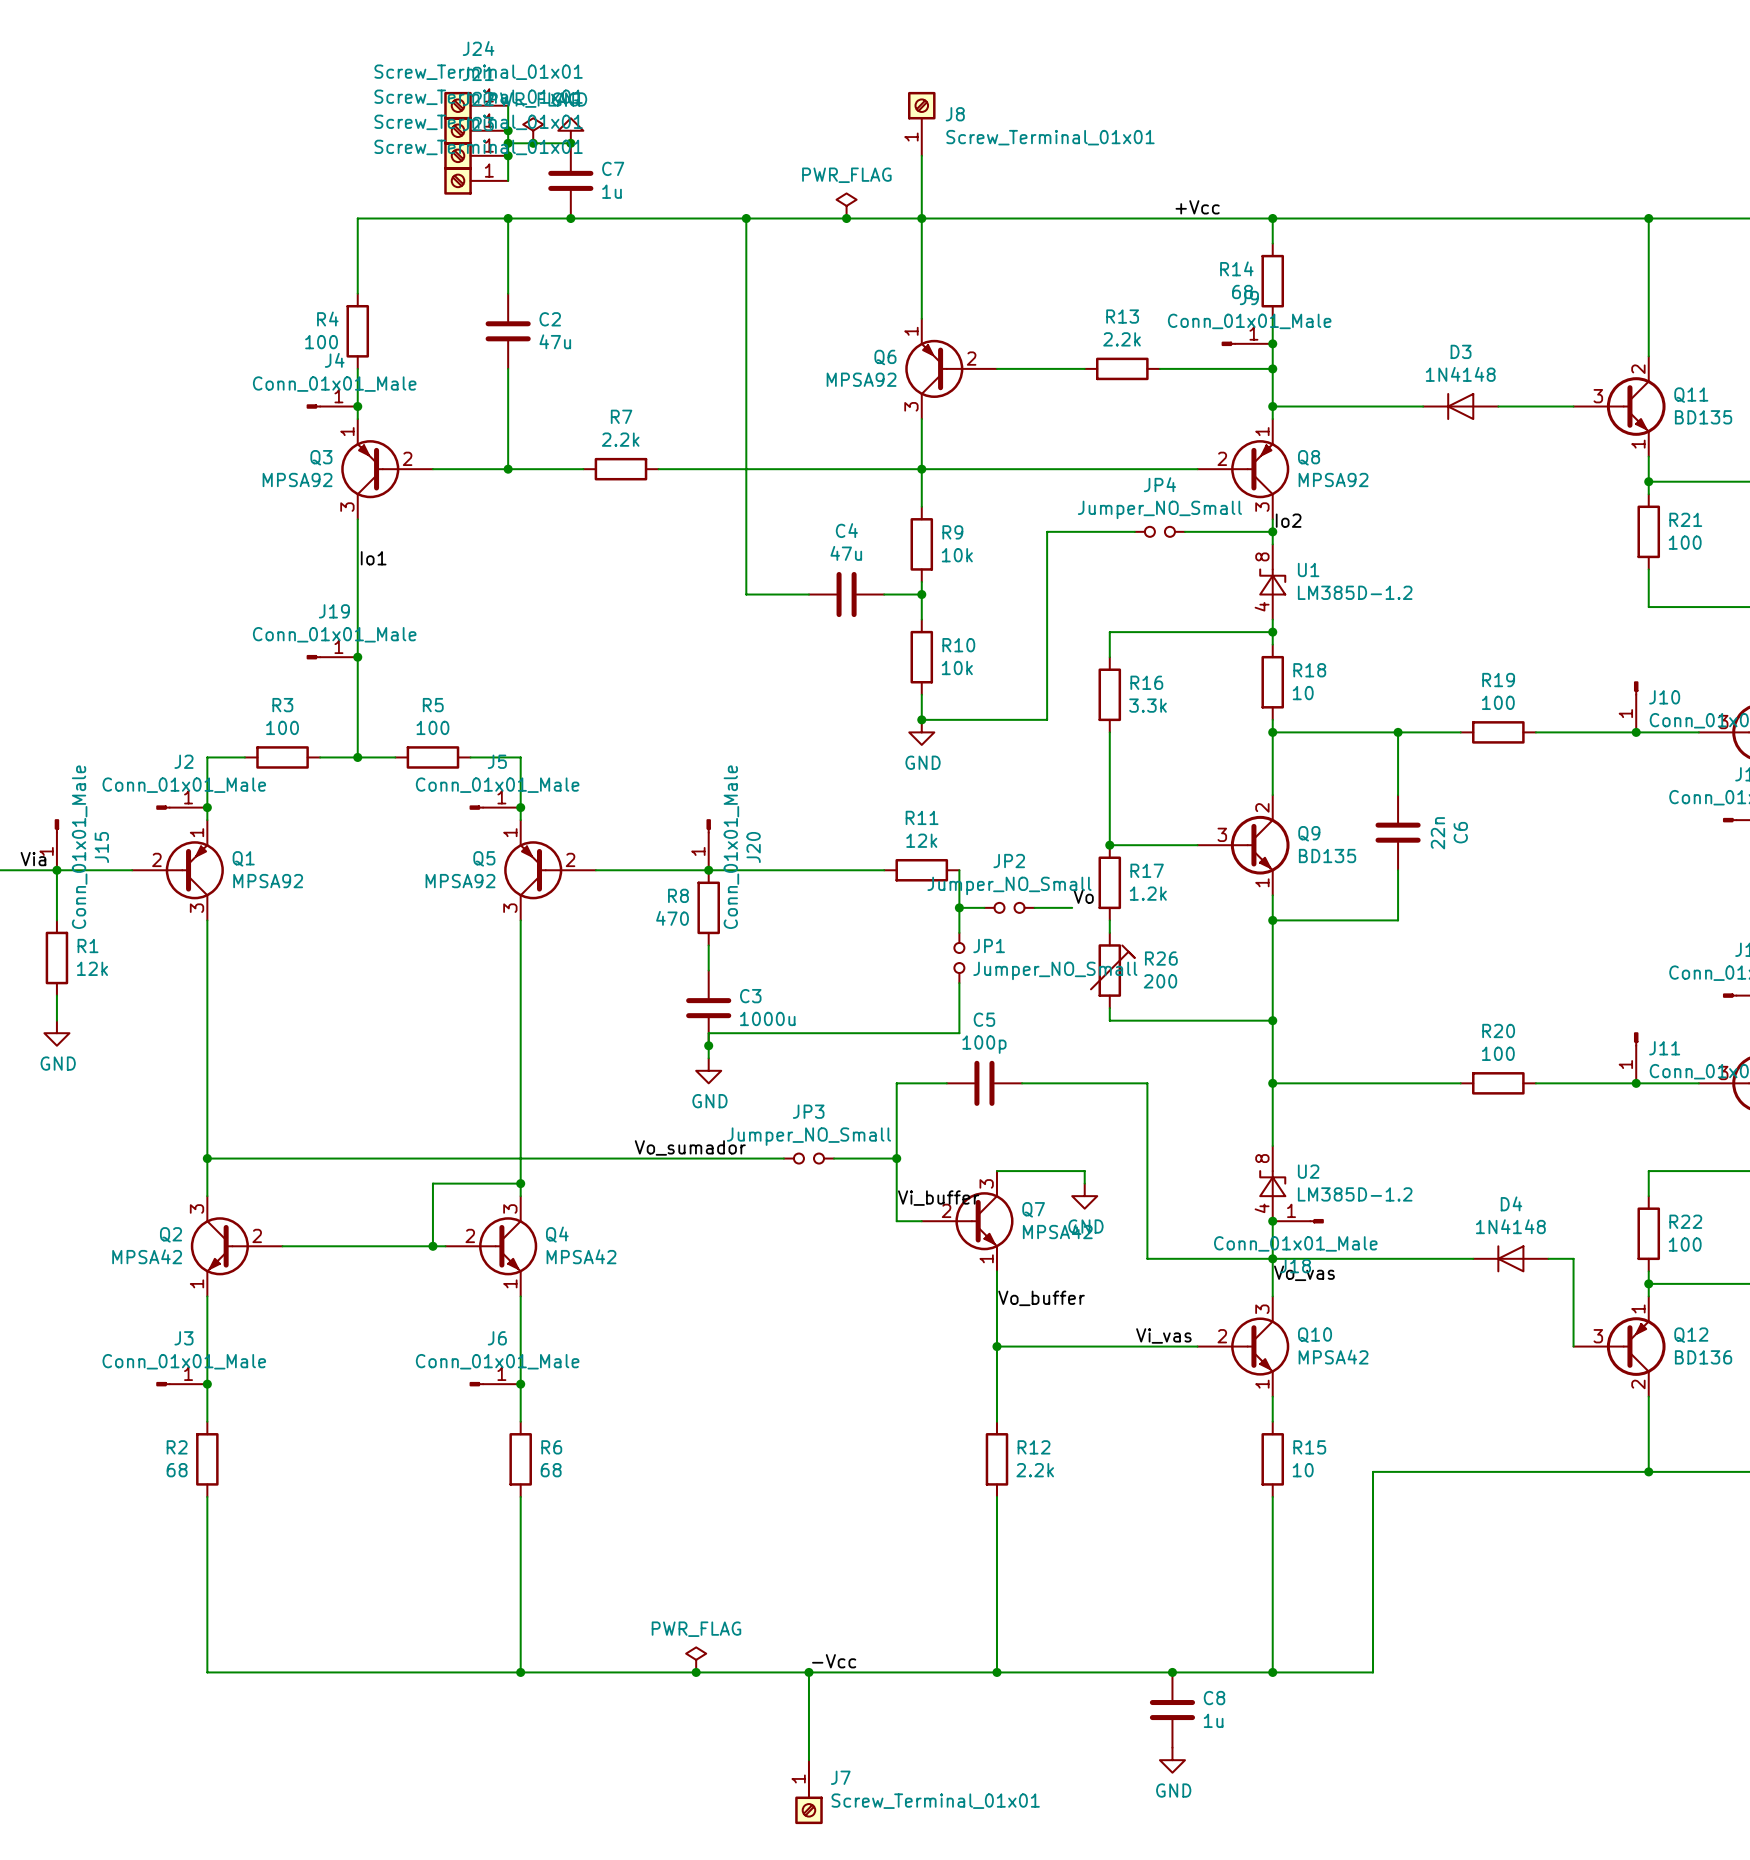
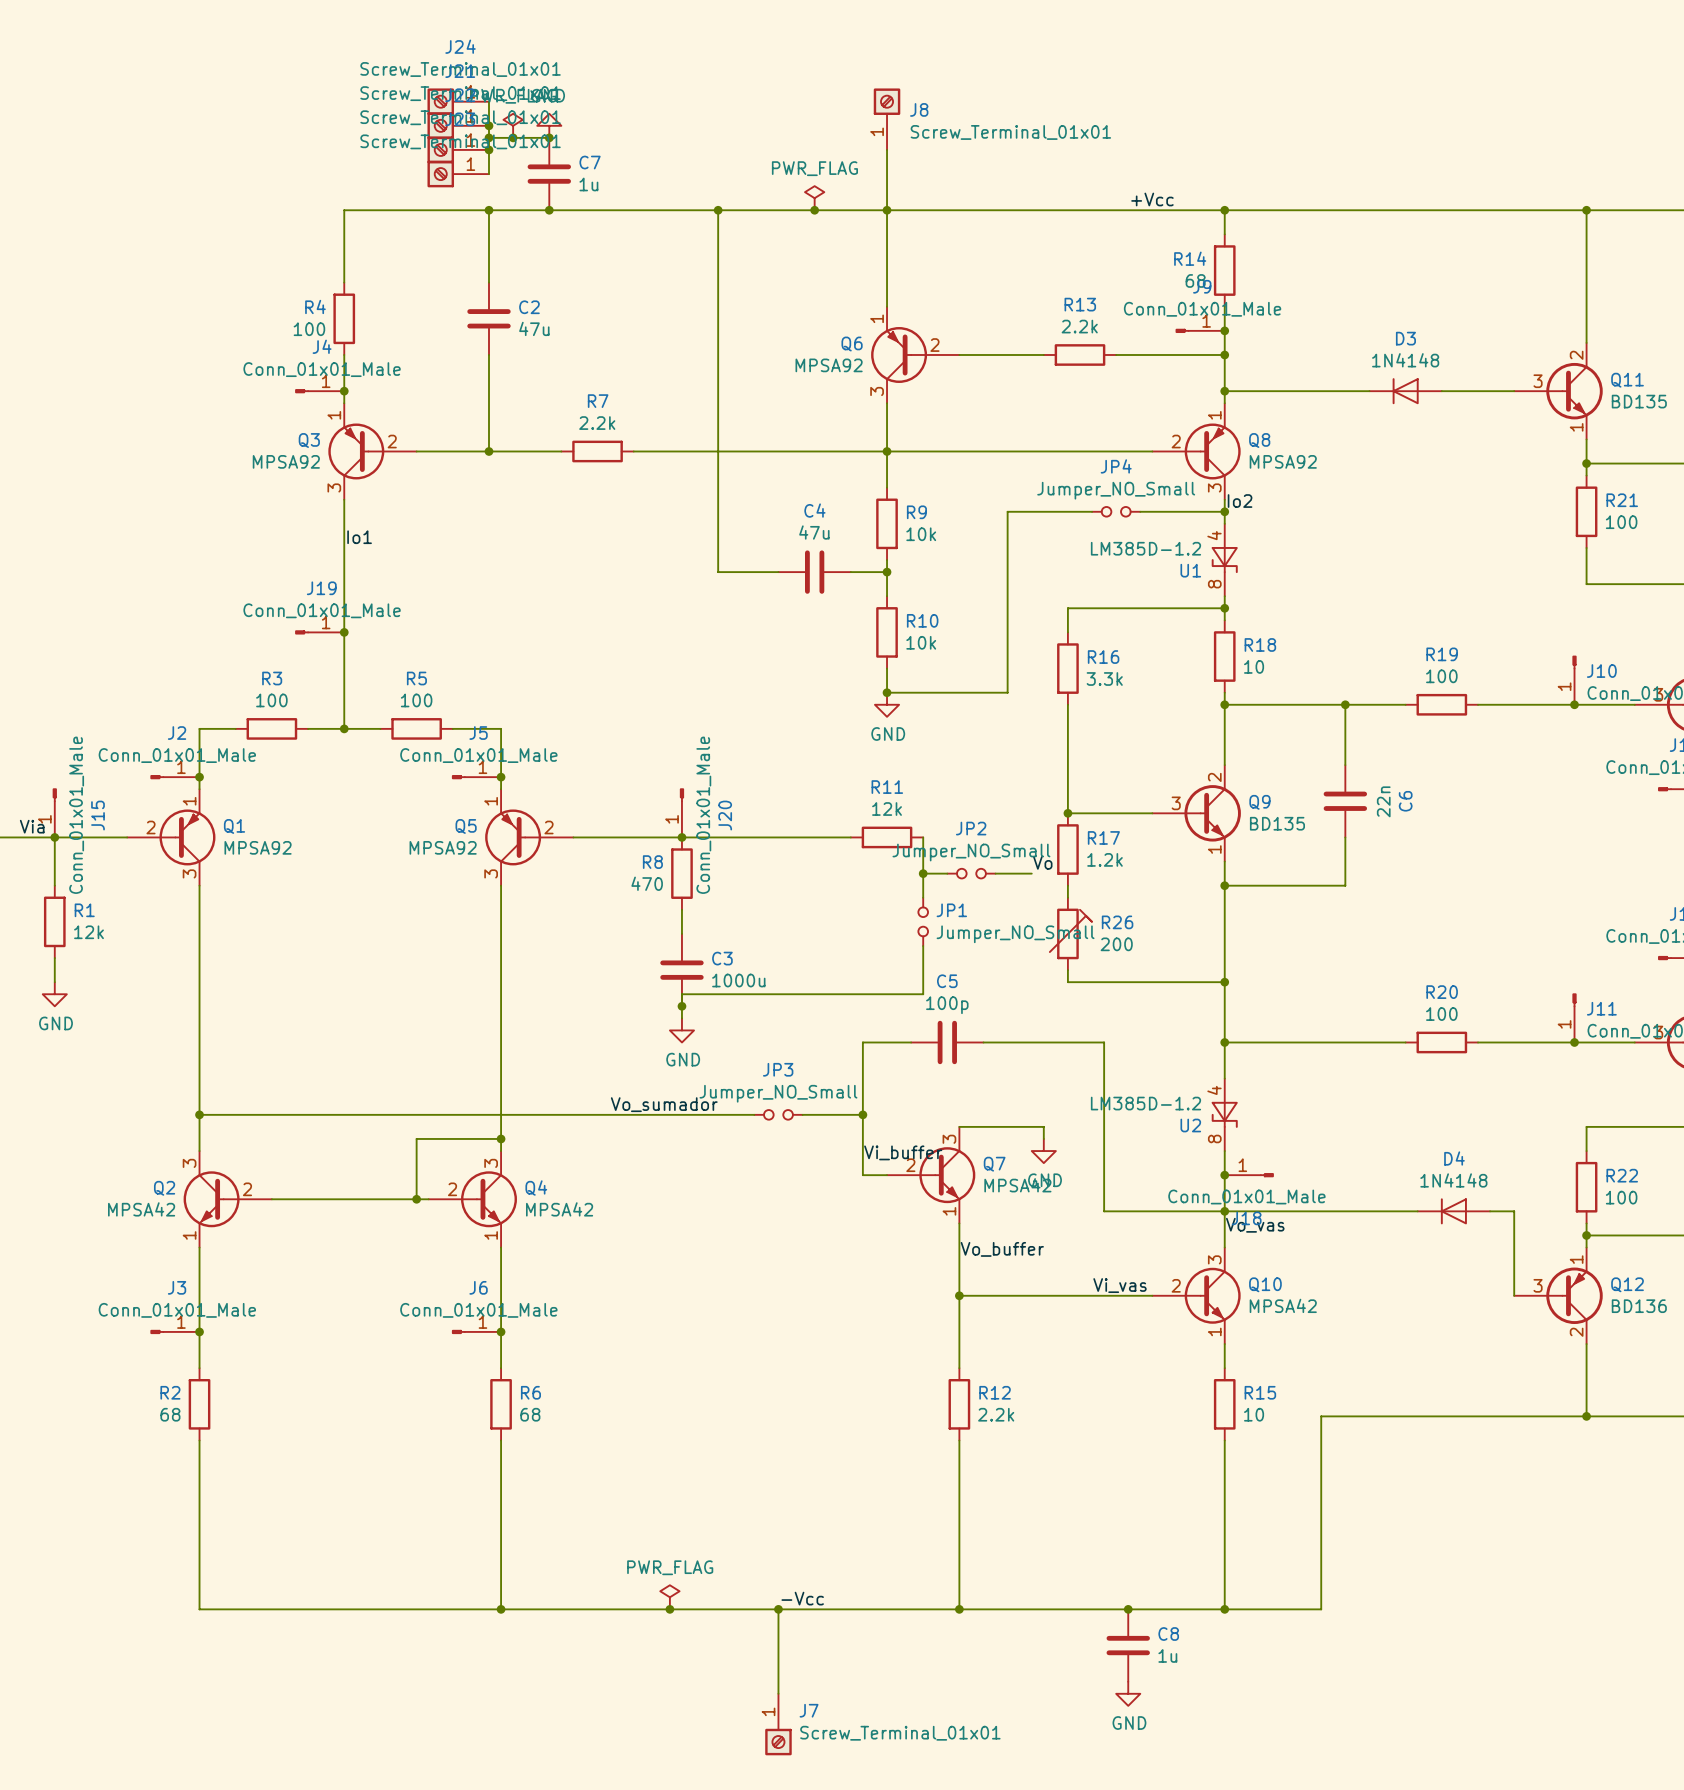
U1 rotation: 0° (1272, 581) -> 180° (1224, 560)
U2 rotation: 0° (1272, 1183) -> 180° (1224, 1114)

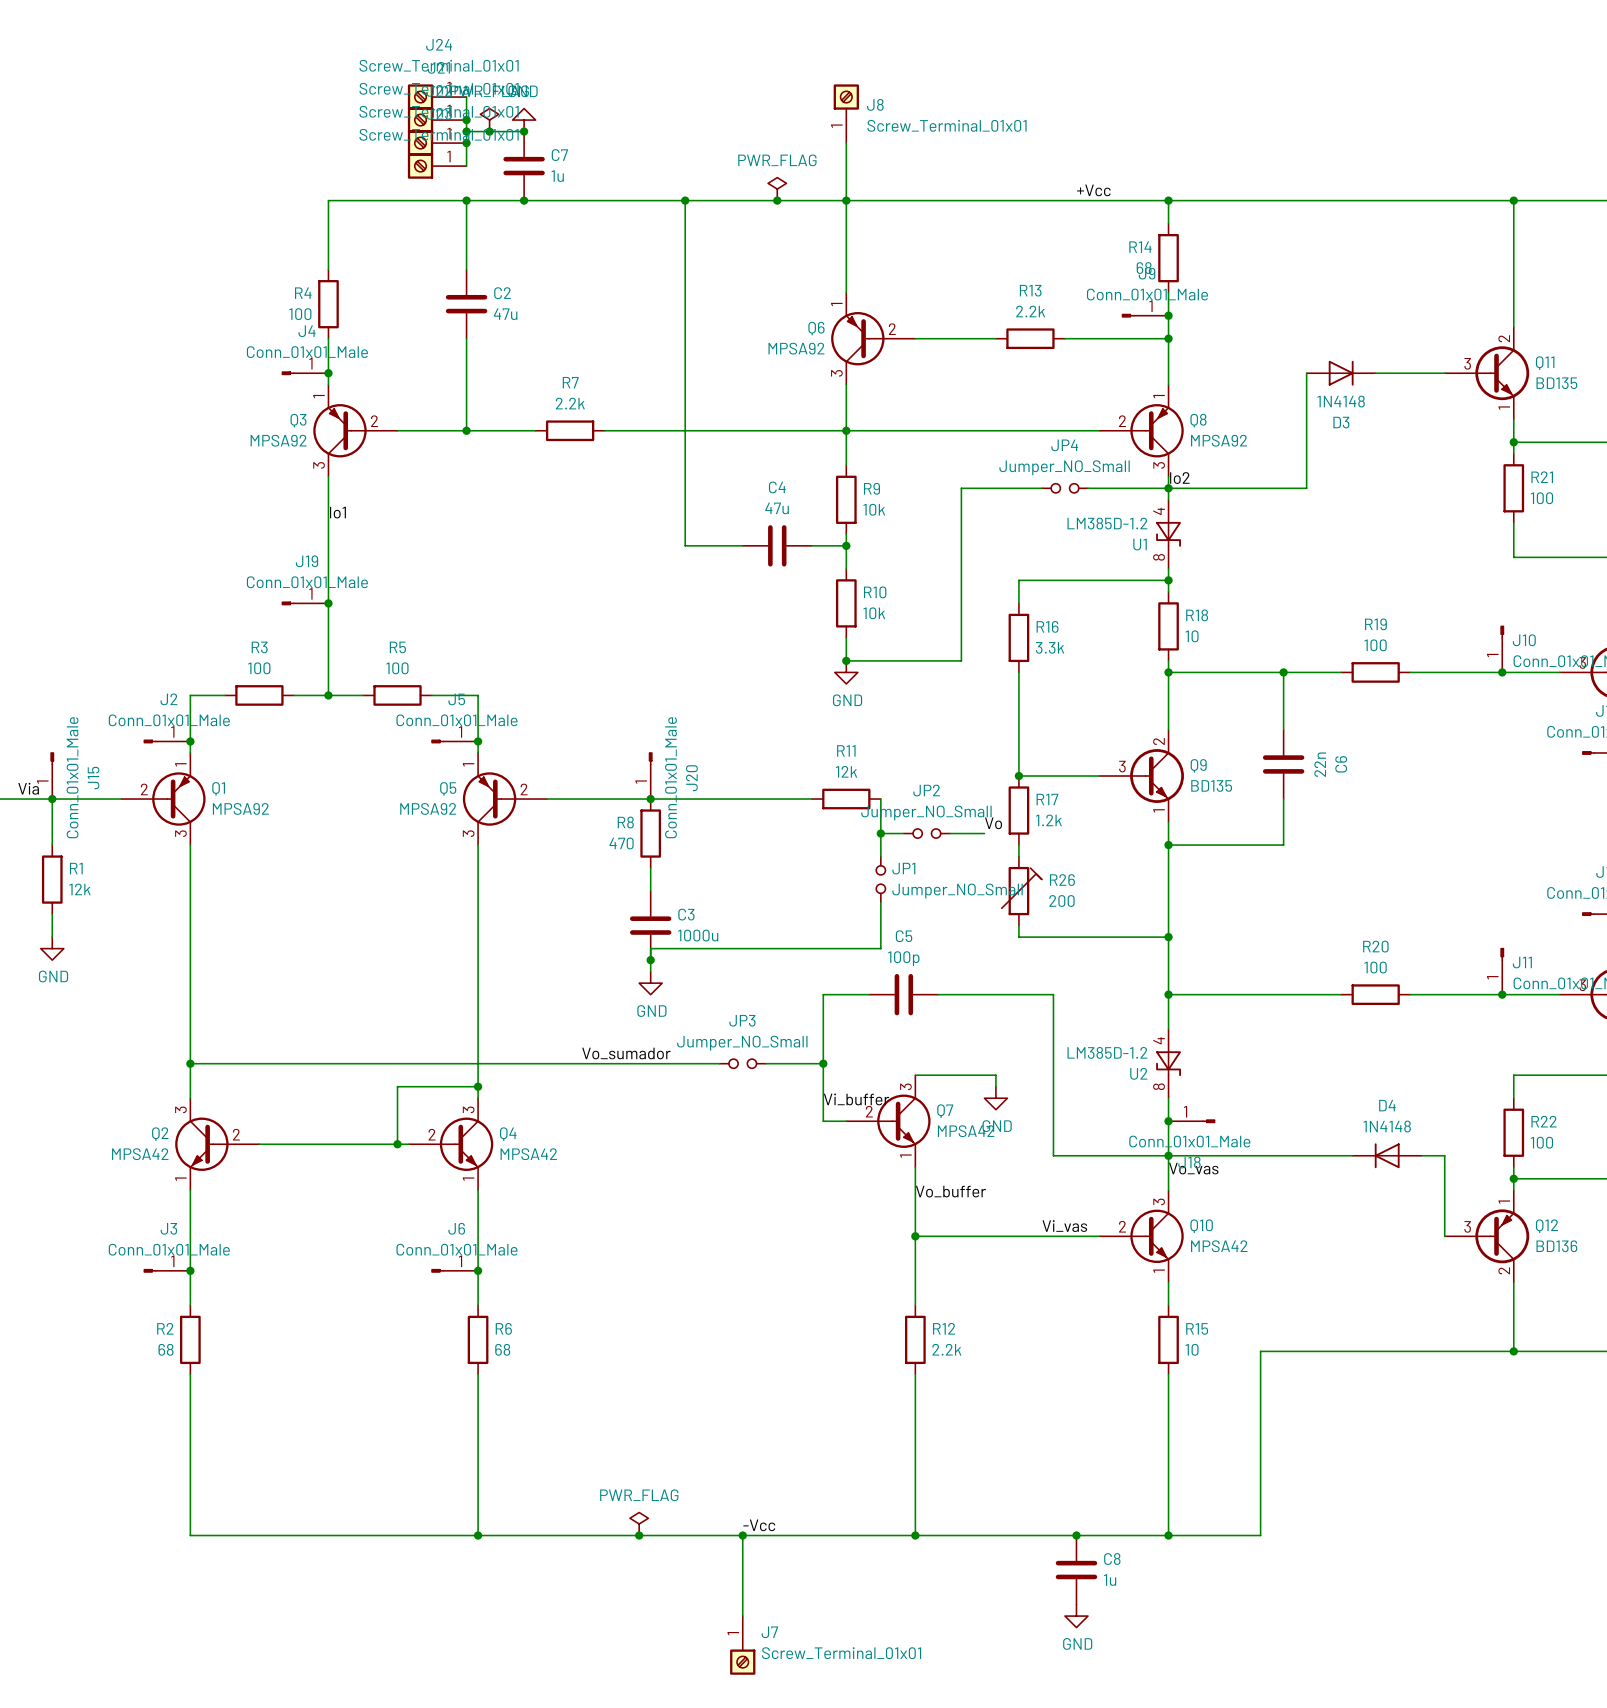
wire: (1224, 391) (1369, 391) -> (1168, 488) (1306, 488) (1306, 373)
junction: (1224, 391) -> none
D3 rotation: 0° (1405, 391) -> 180° (1341, 373)

